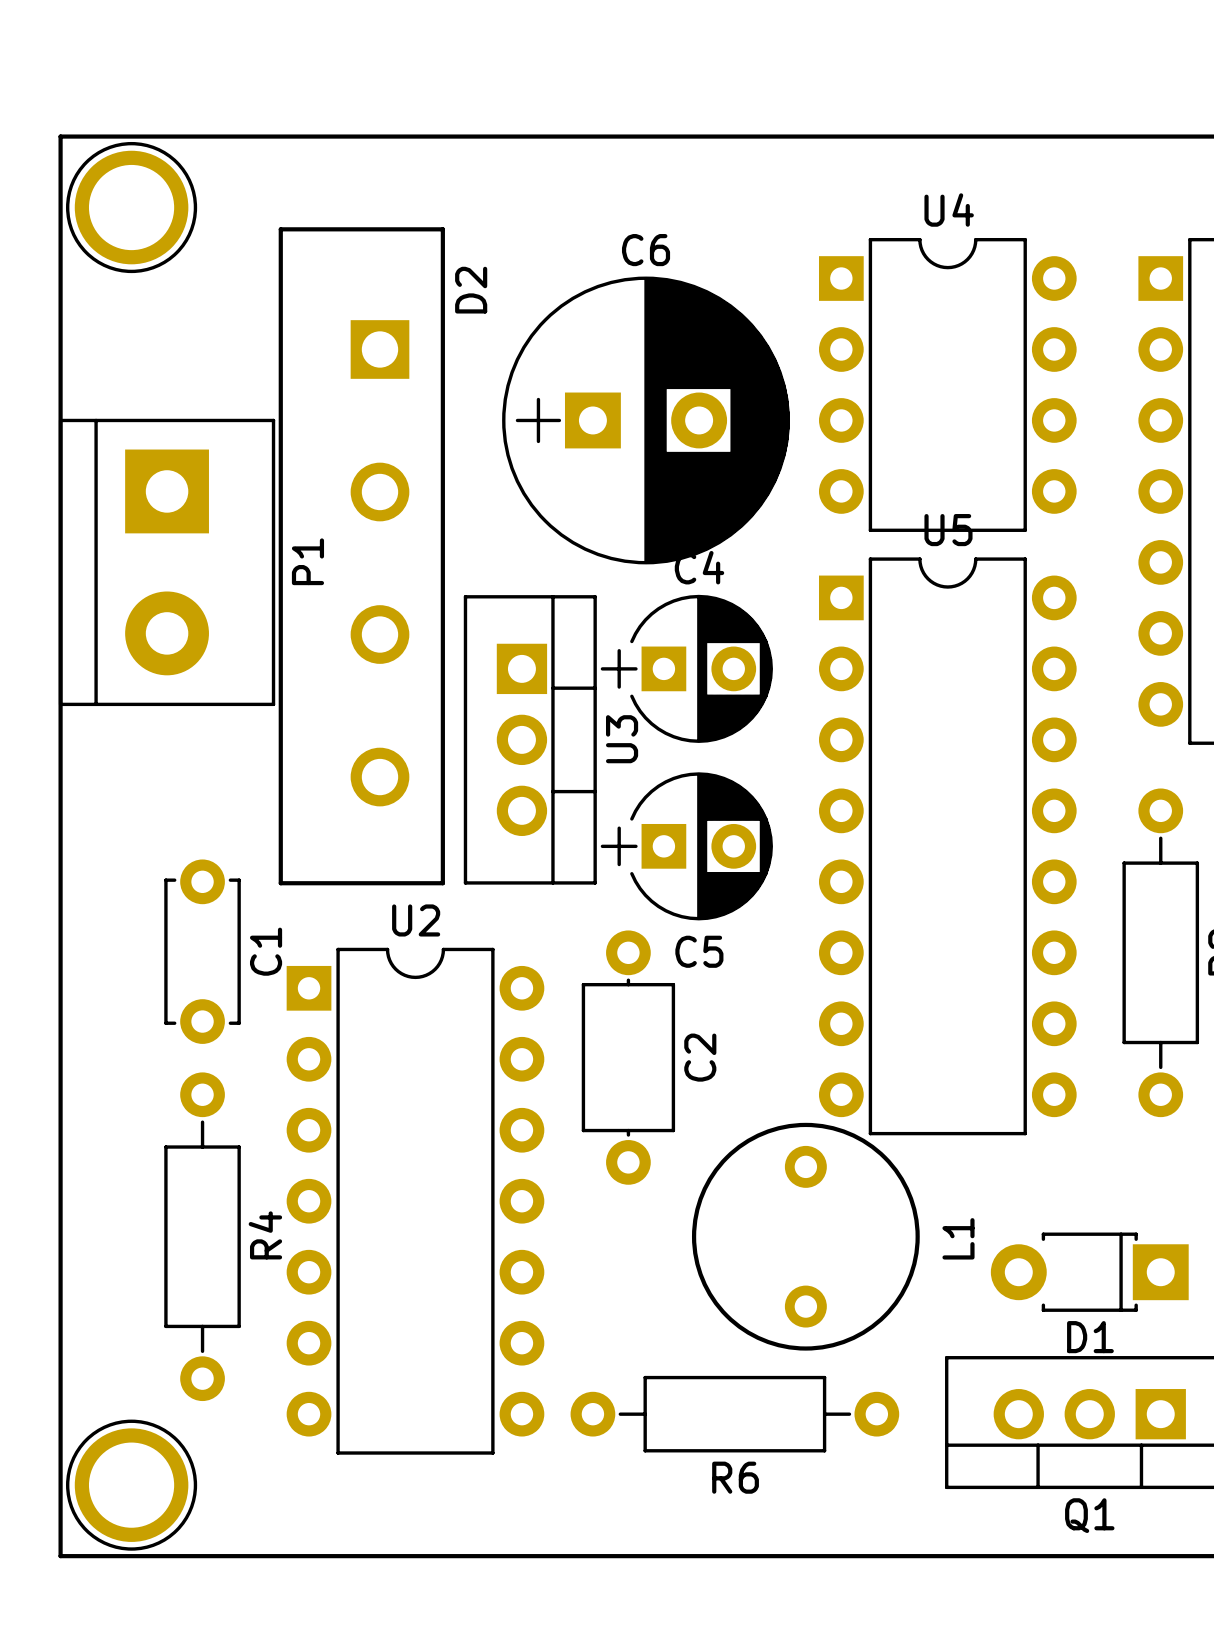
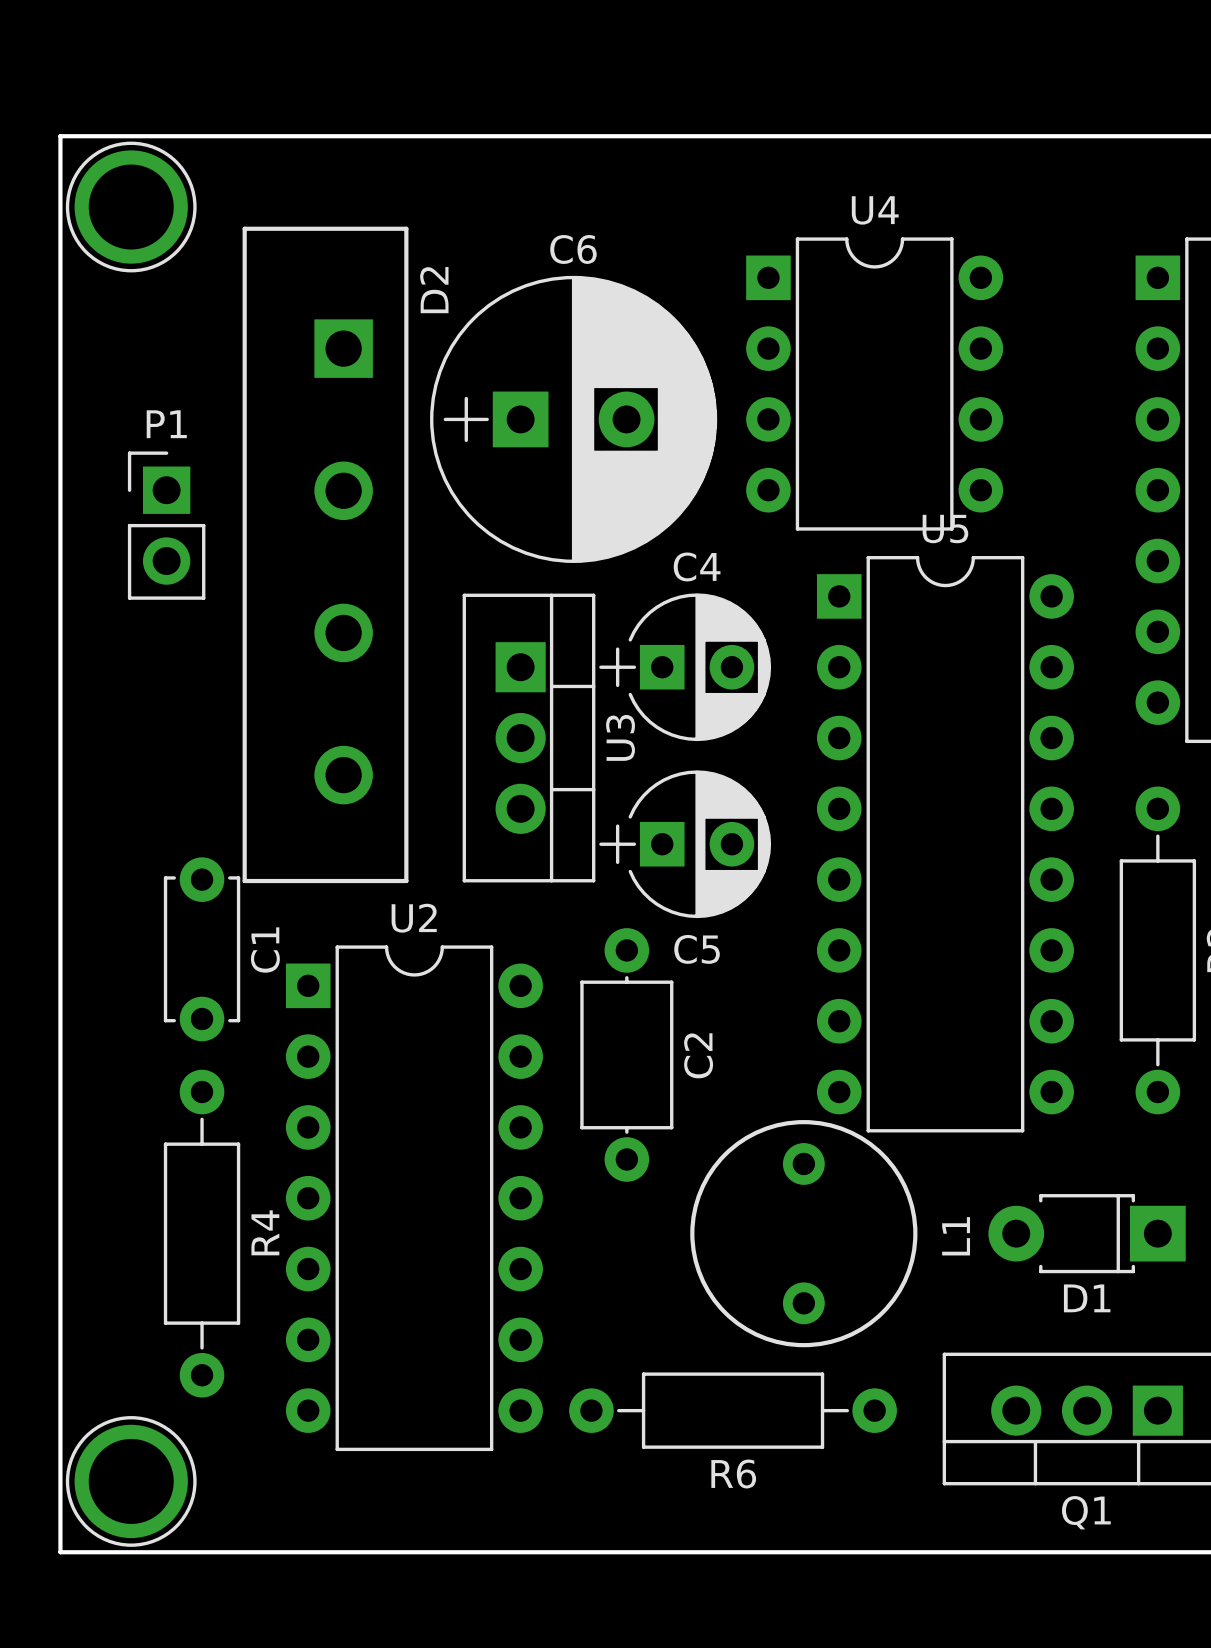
U4 position: (947, 384) -> (874, 384)
P1 footprint: [58, 418, 276, 707] -> [127, 451, 206, 600]
C6 position: (646, 420) -> (573, 419)
D2 position: (361, 556) -> (325, 554)
P1 name position: P1 (307, 561) -> P1 (166, 424)
D1 position: (1089, 1272) -> (1087, 1233)

